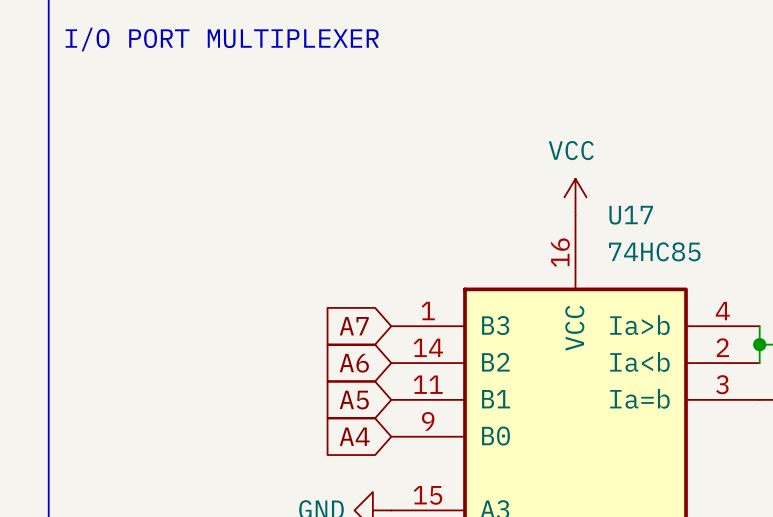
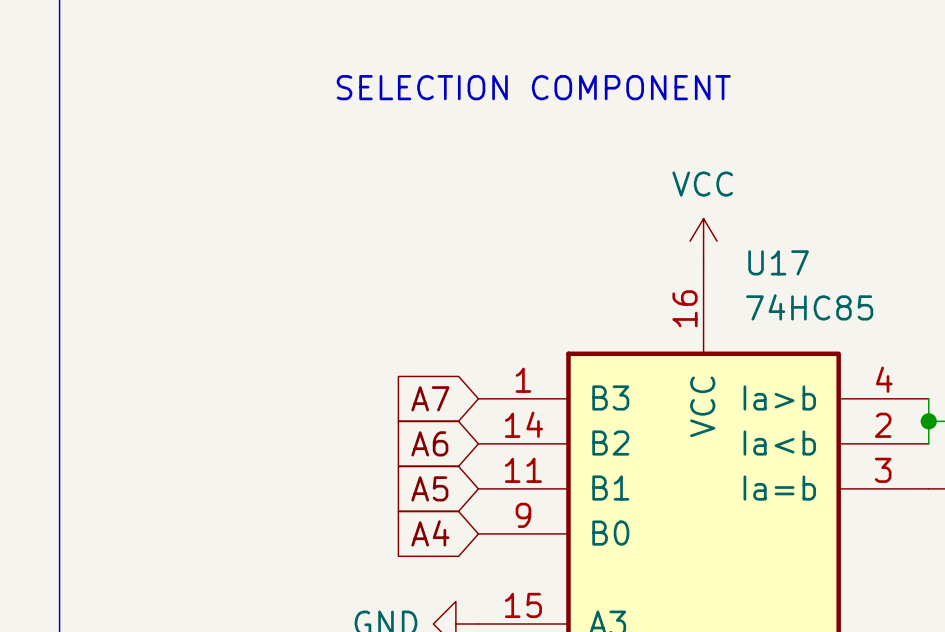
text: I/O PORT MULTIPLEXER (222, 39) -> none
text: none -> SELECTION COMPONENT (533, 87)

